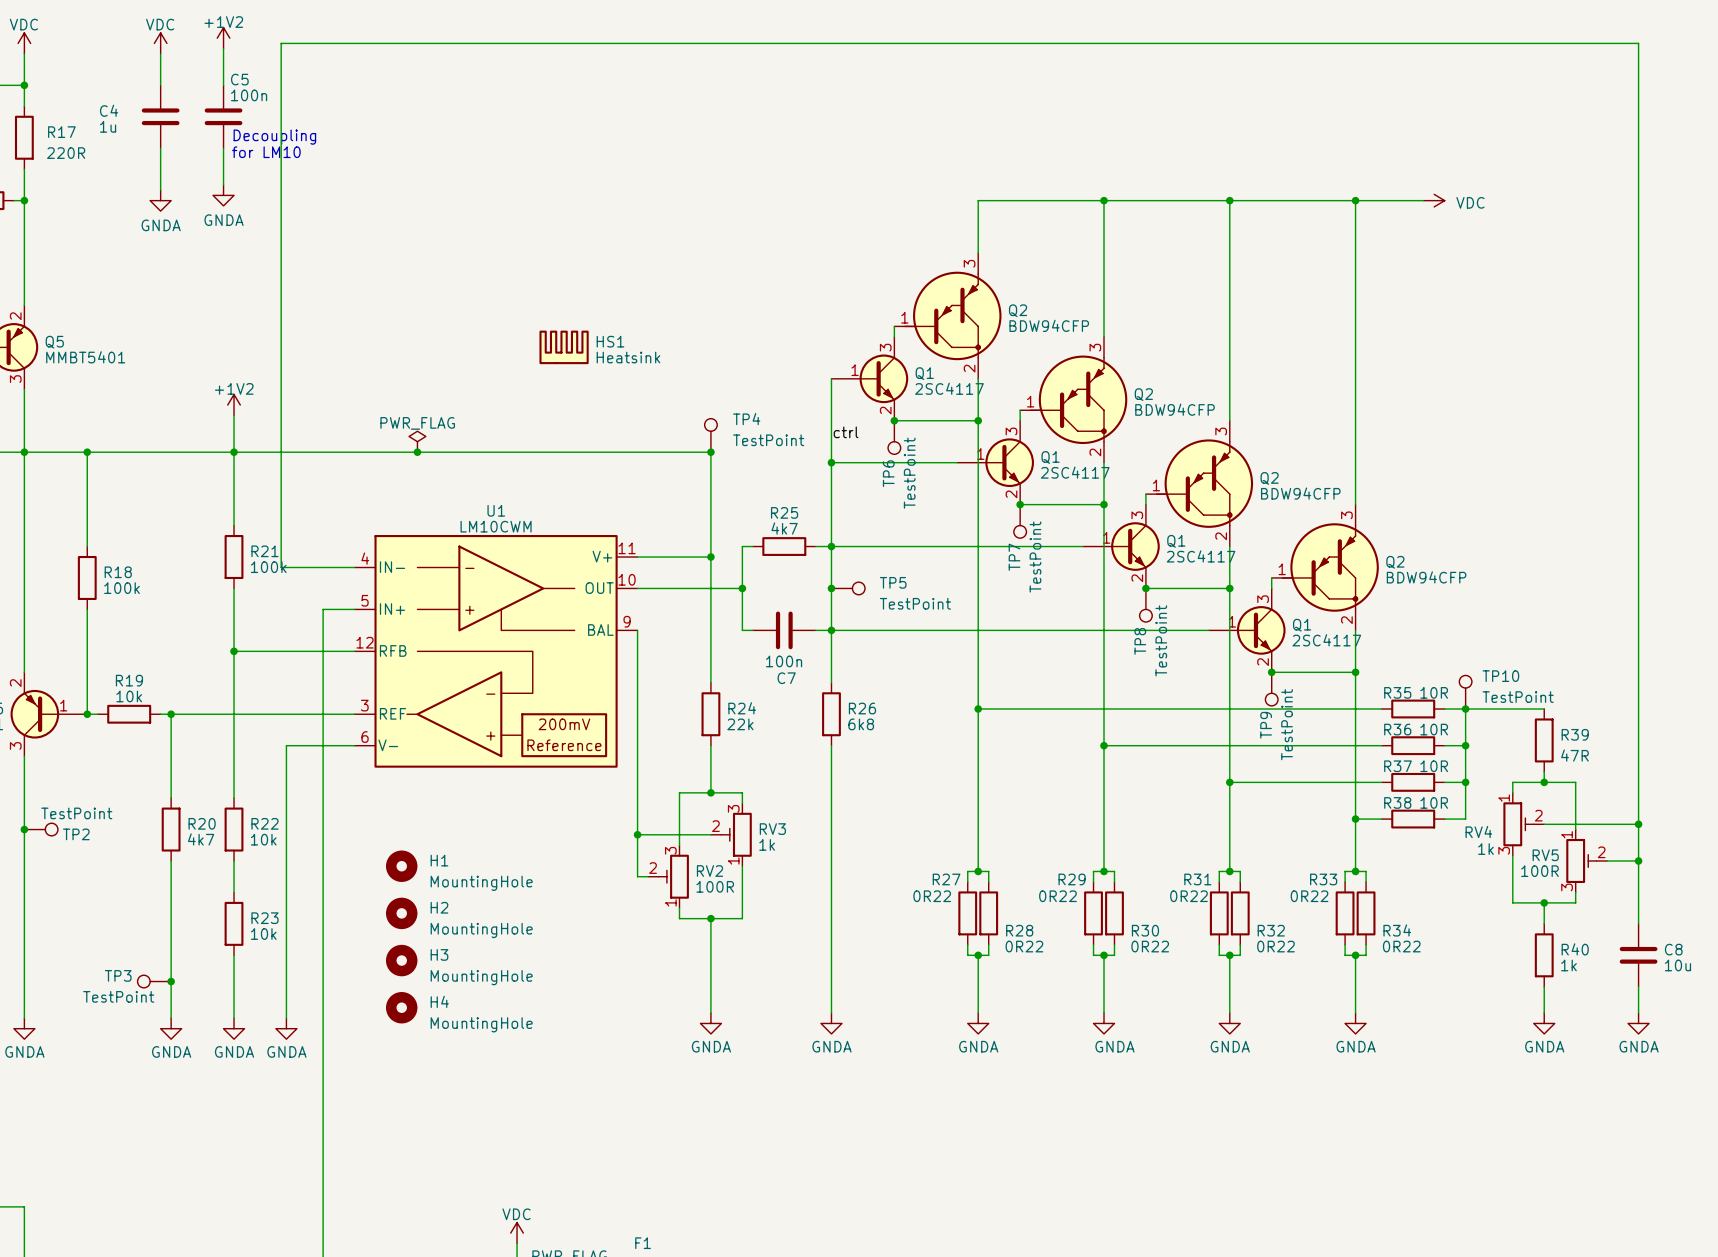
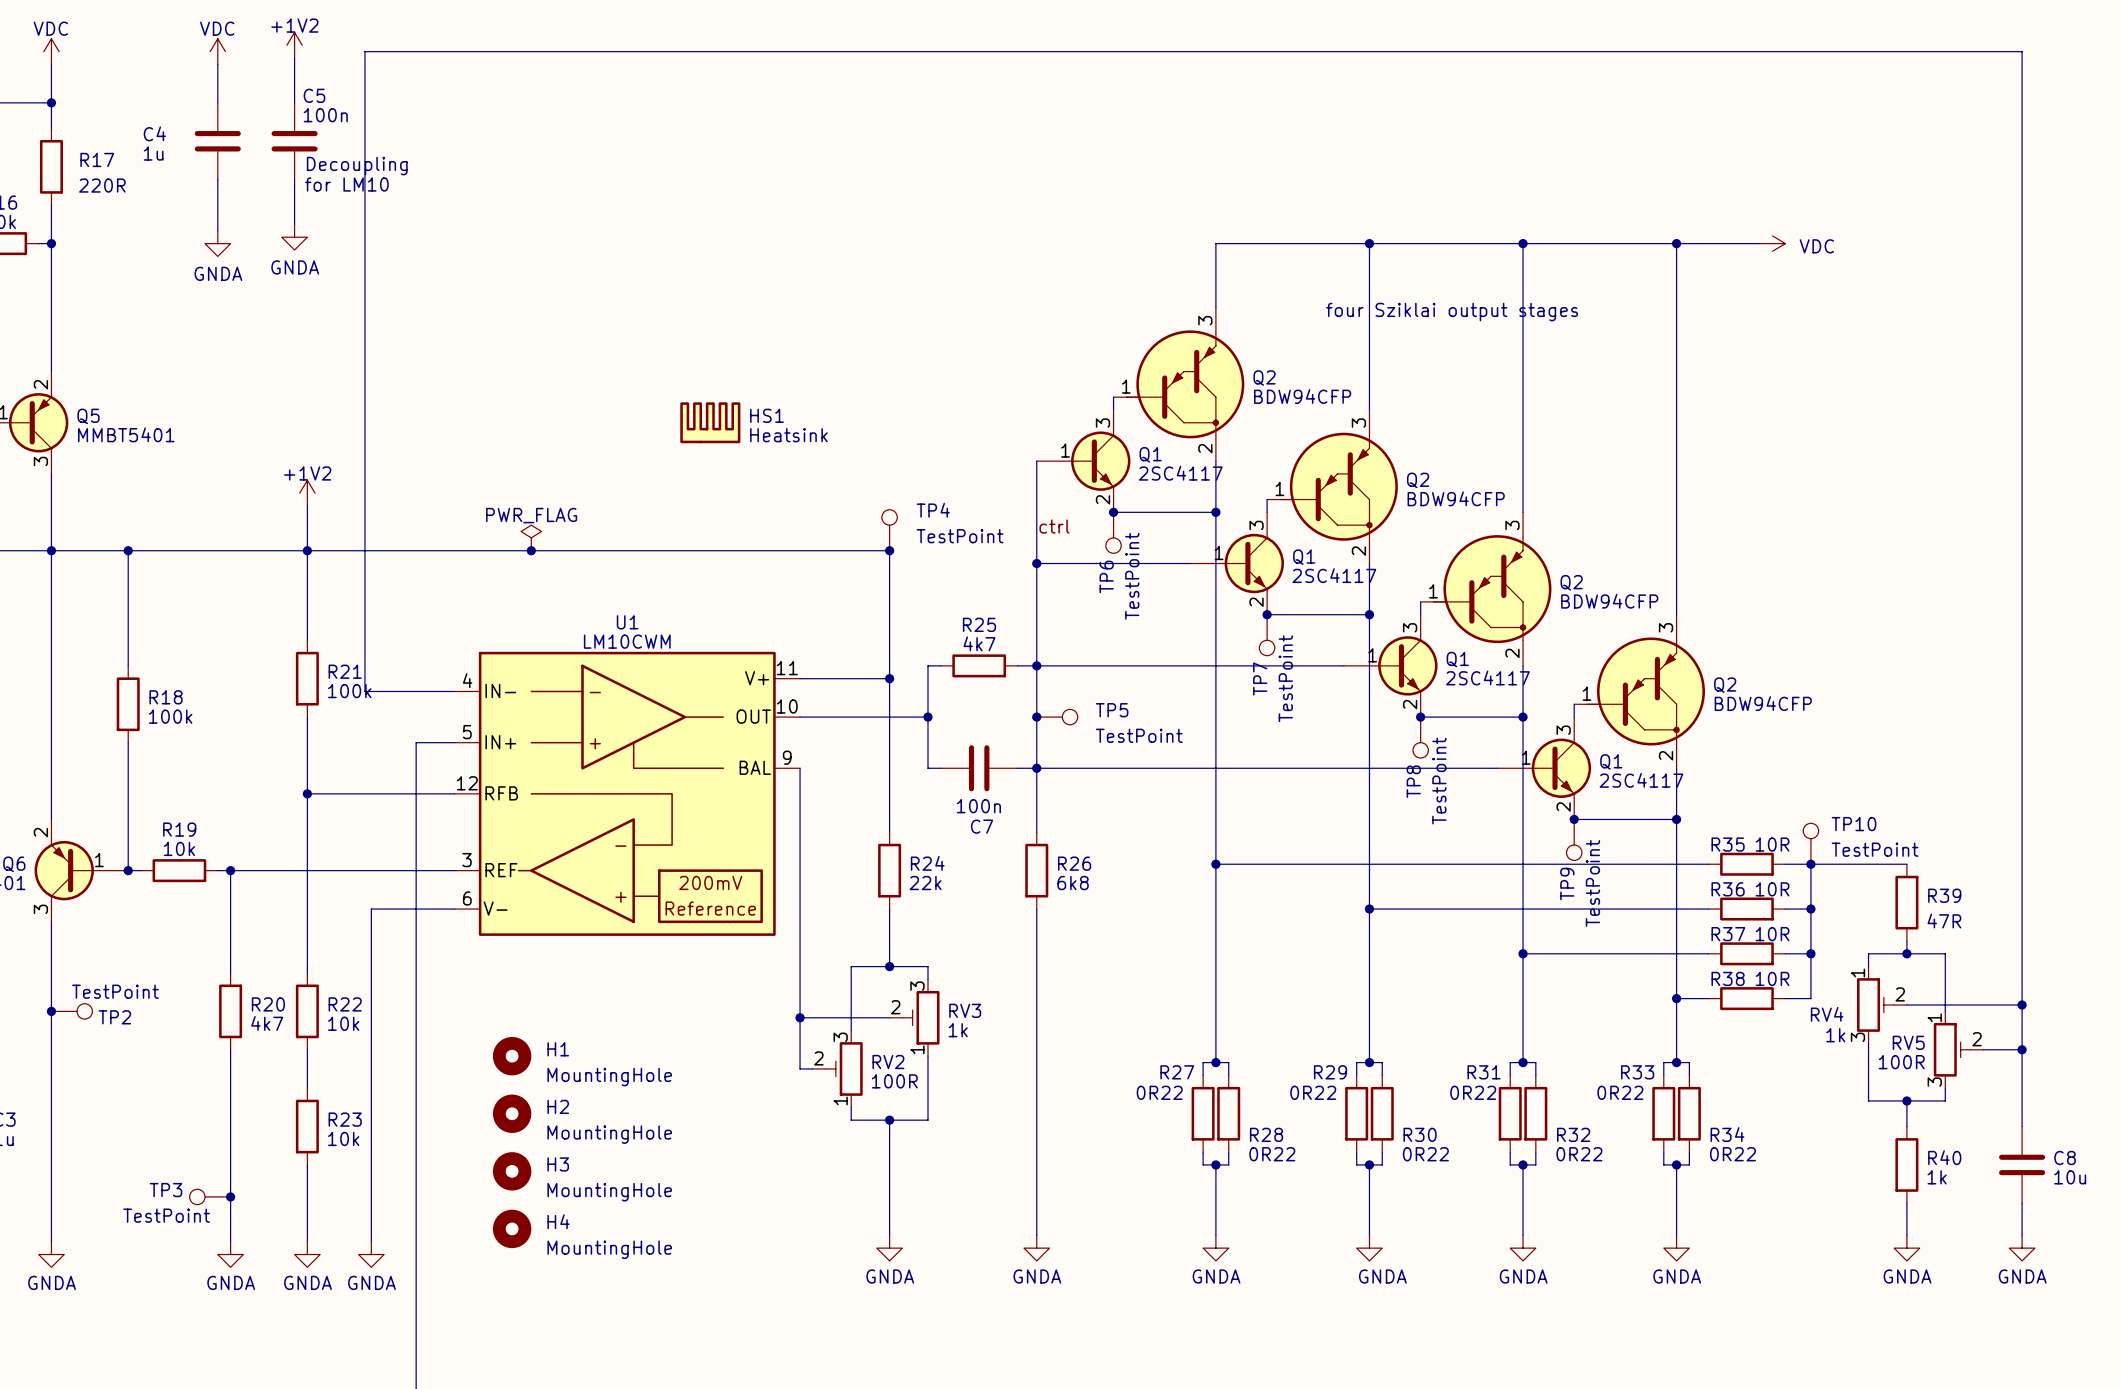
text: none -> four Sziklai output stages (1452, 312)

